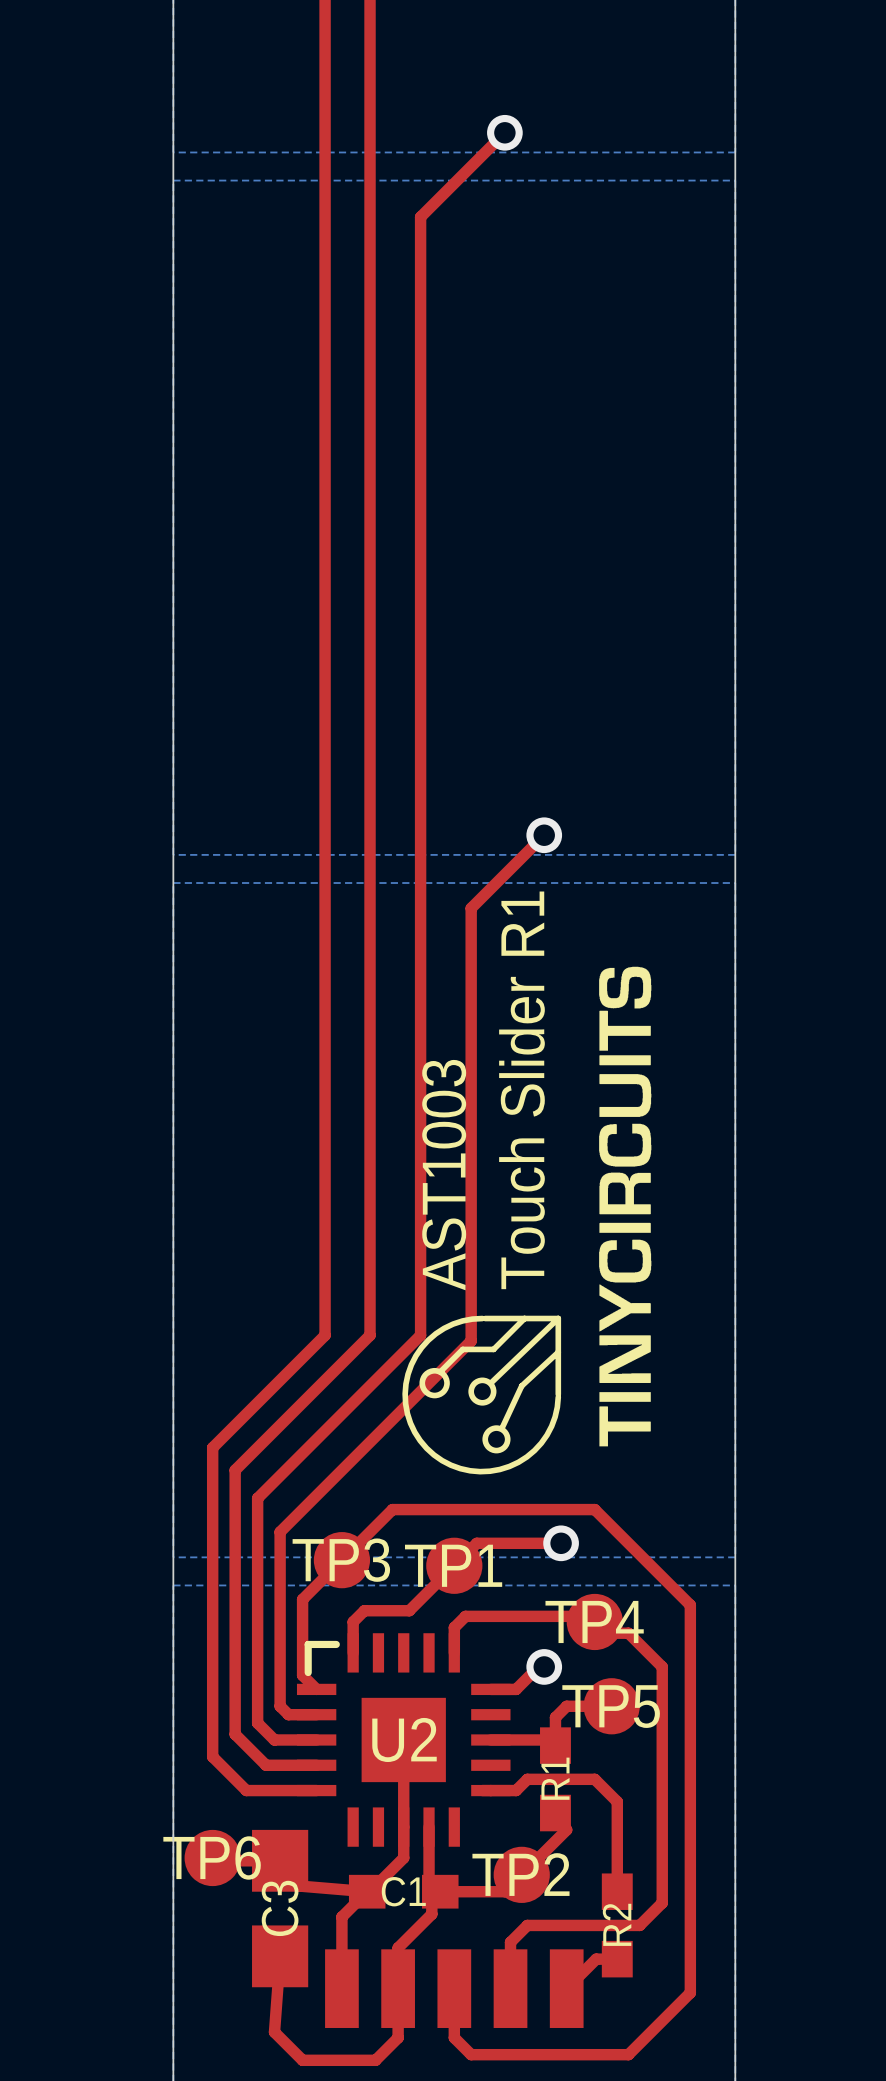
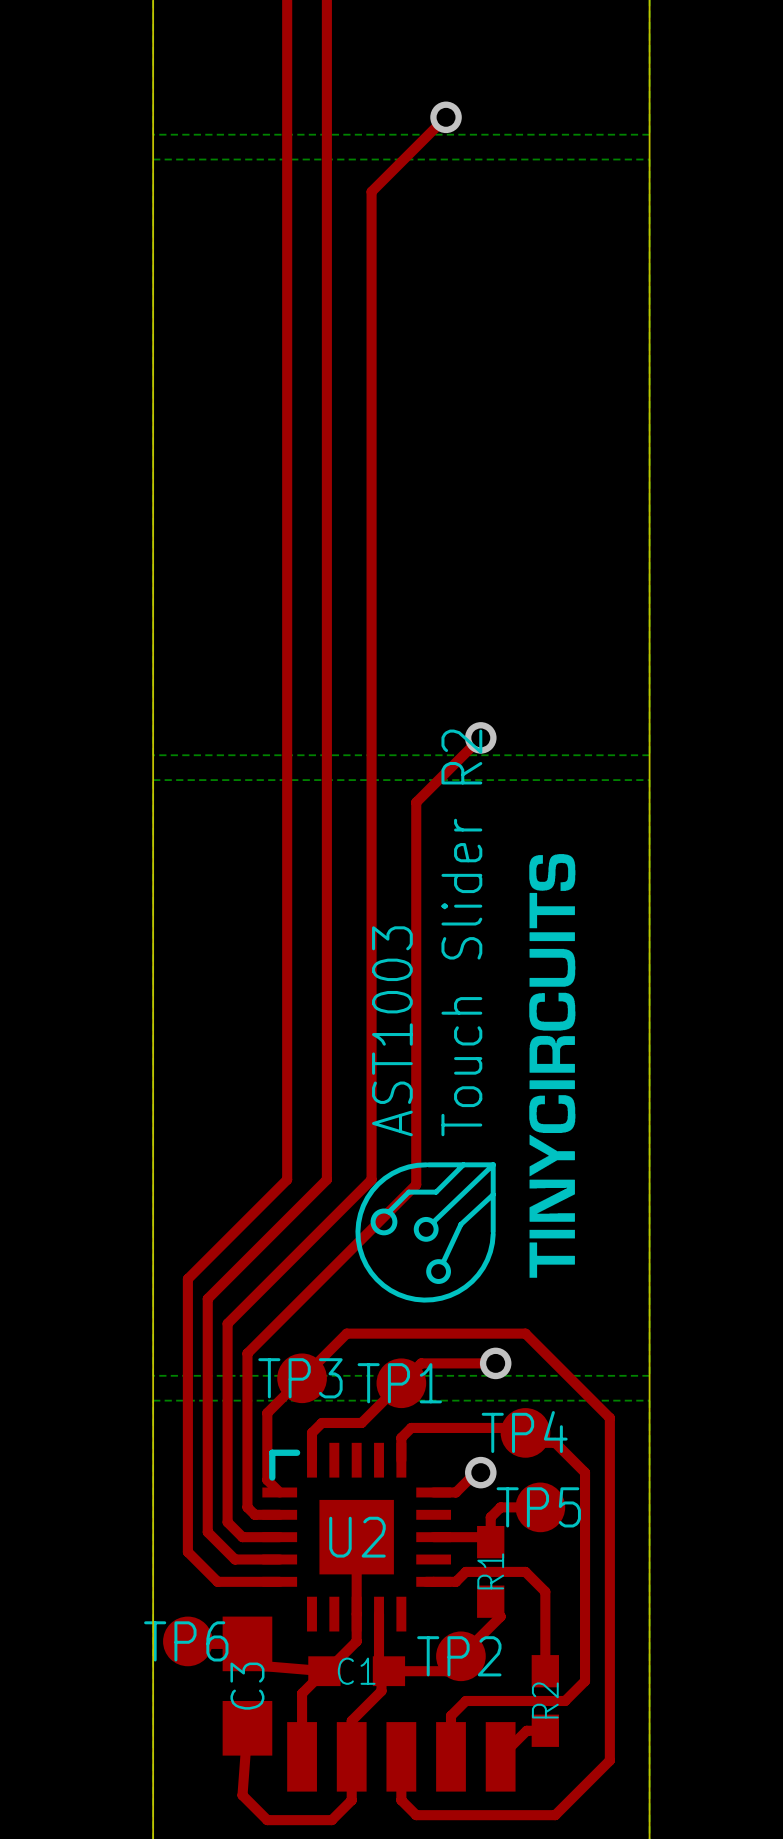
text: Touch Slider R1 (521, 1090) -> Touch Slider R2 (461, 932)

